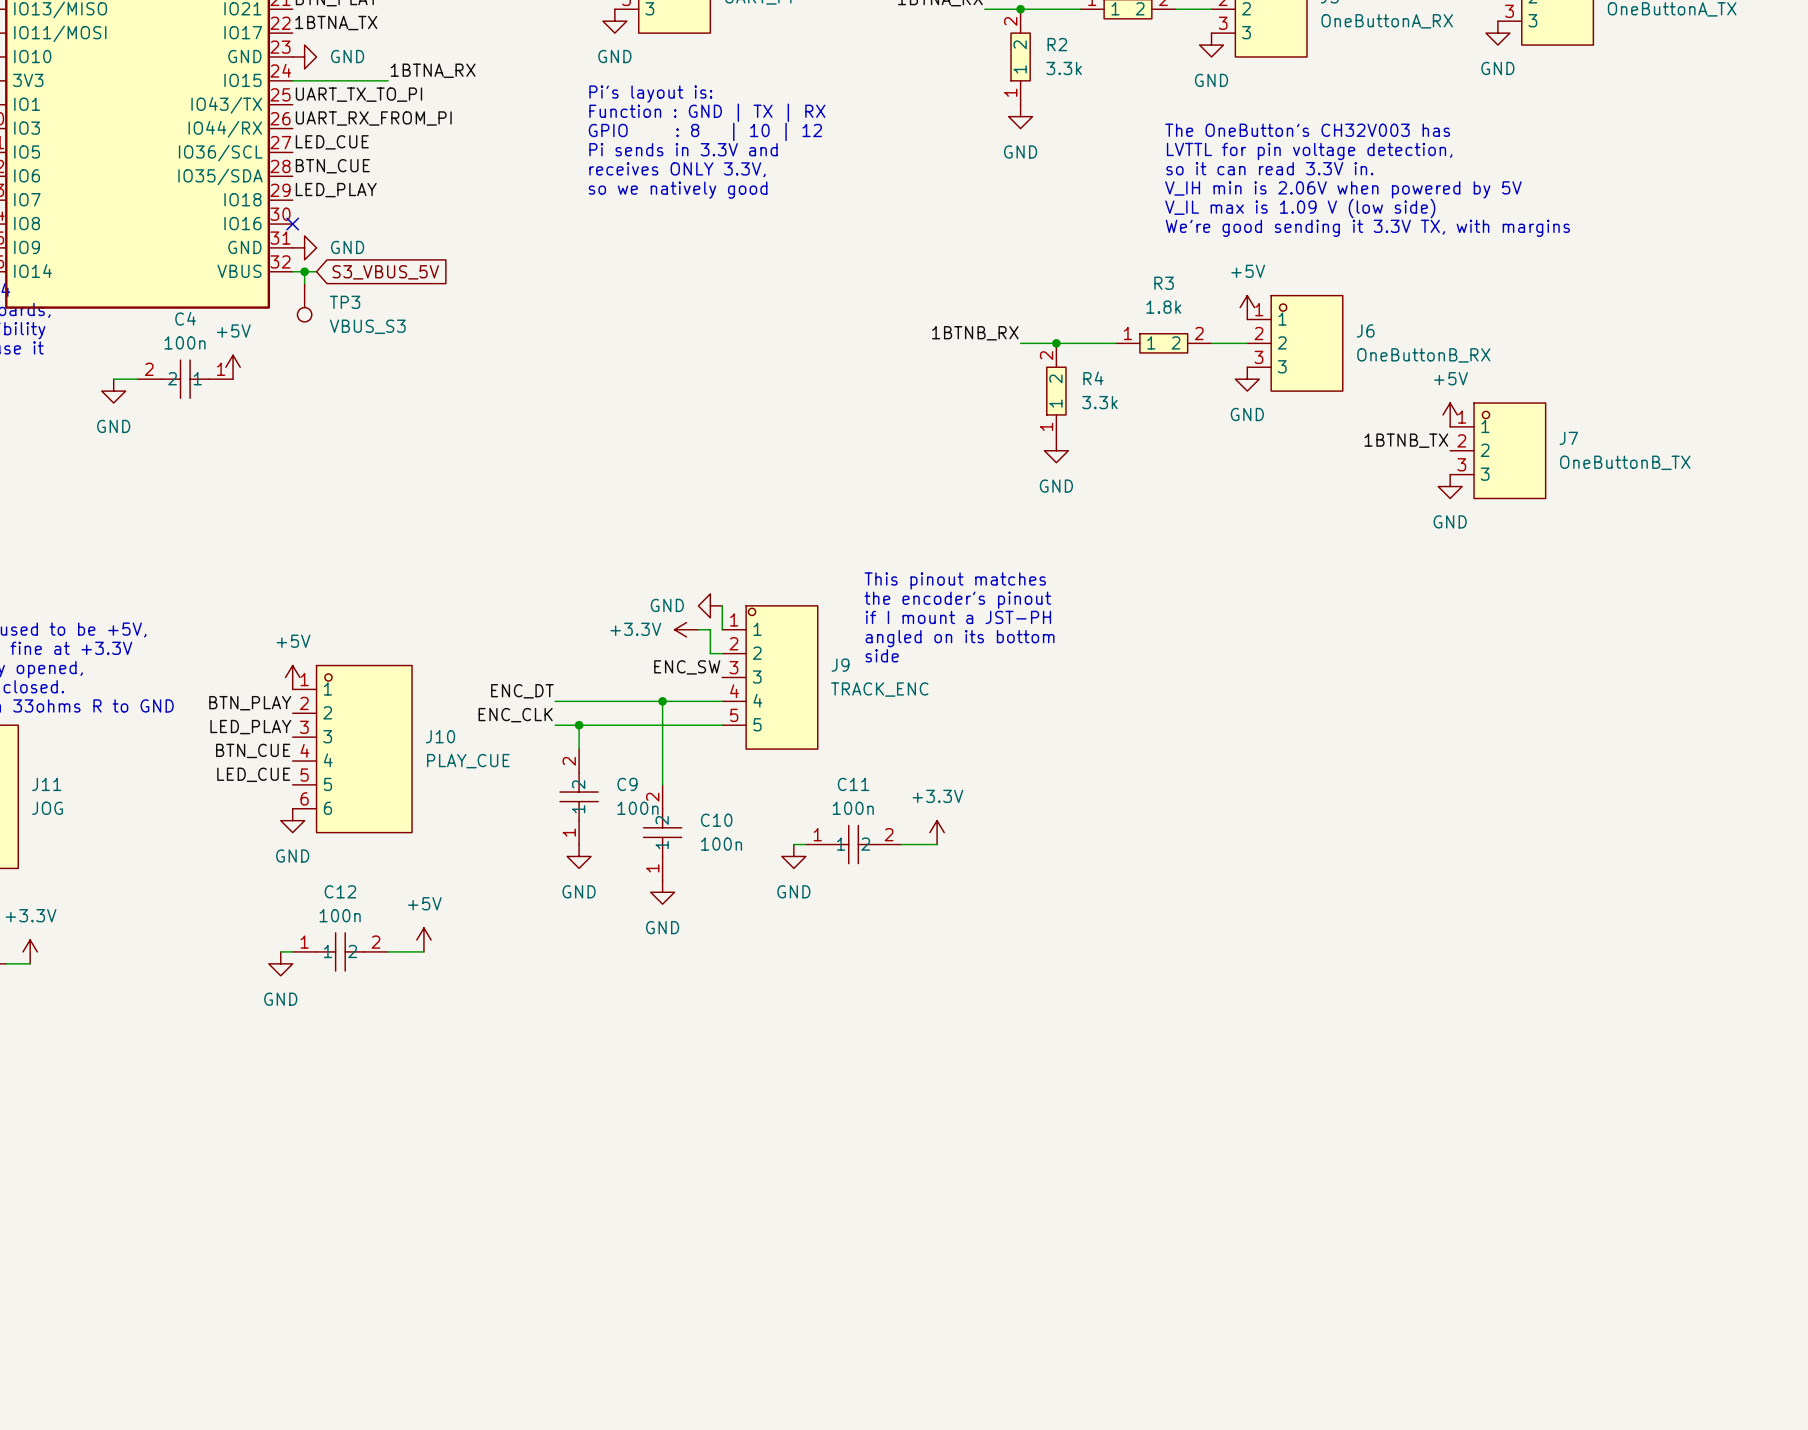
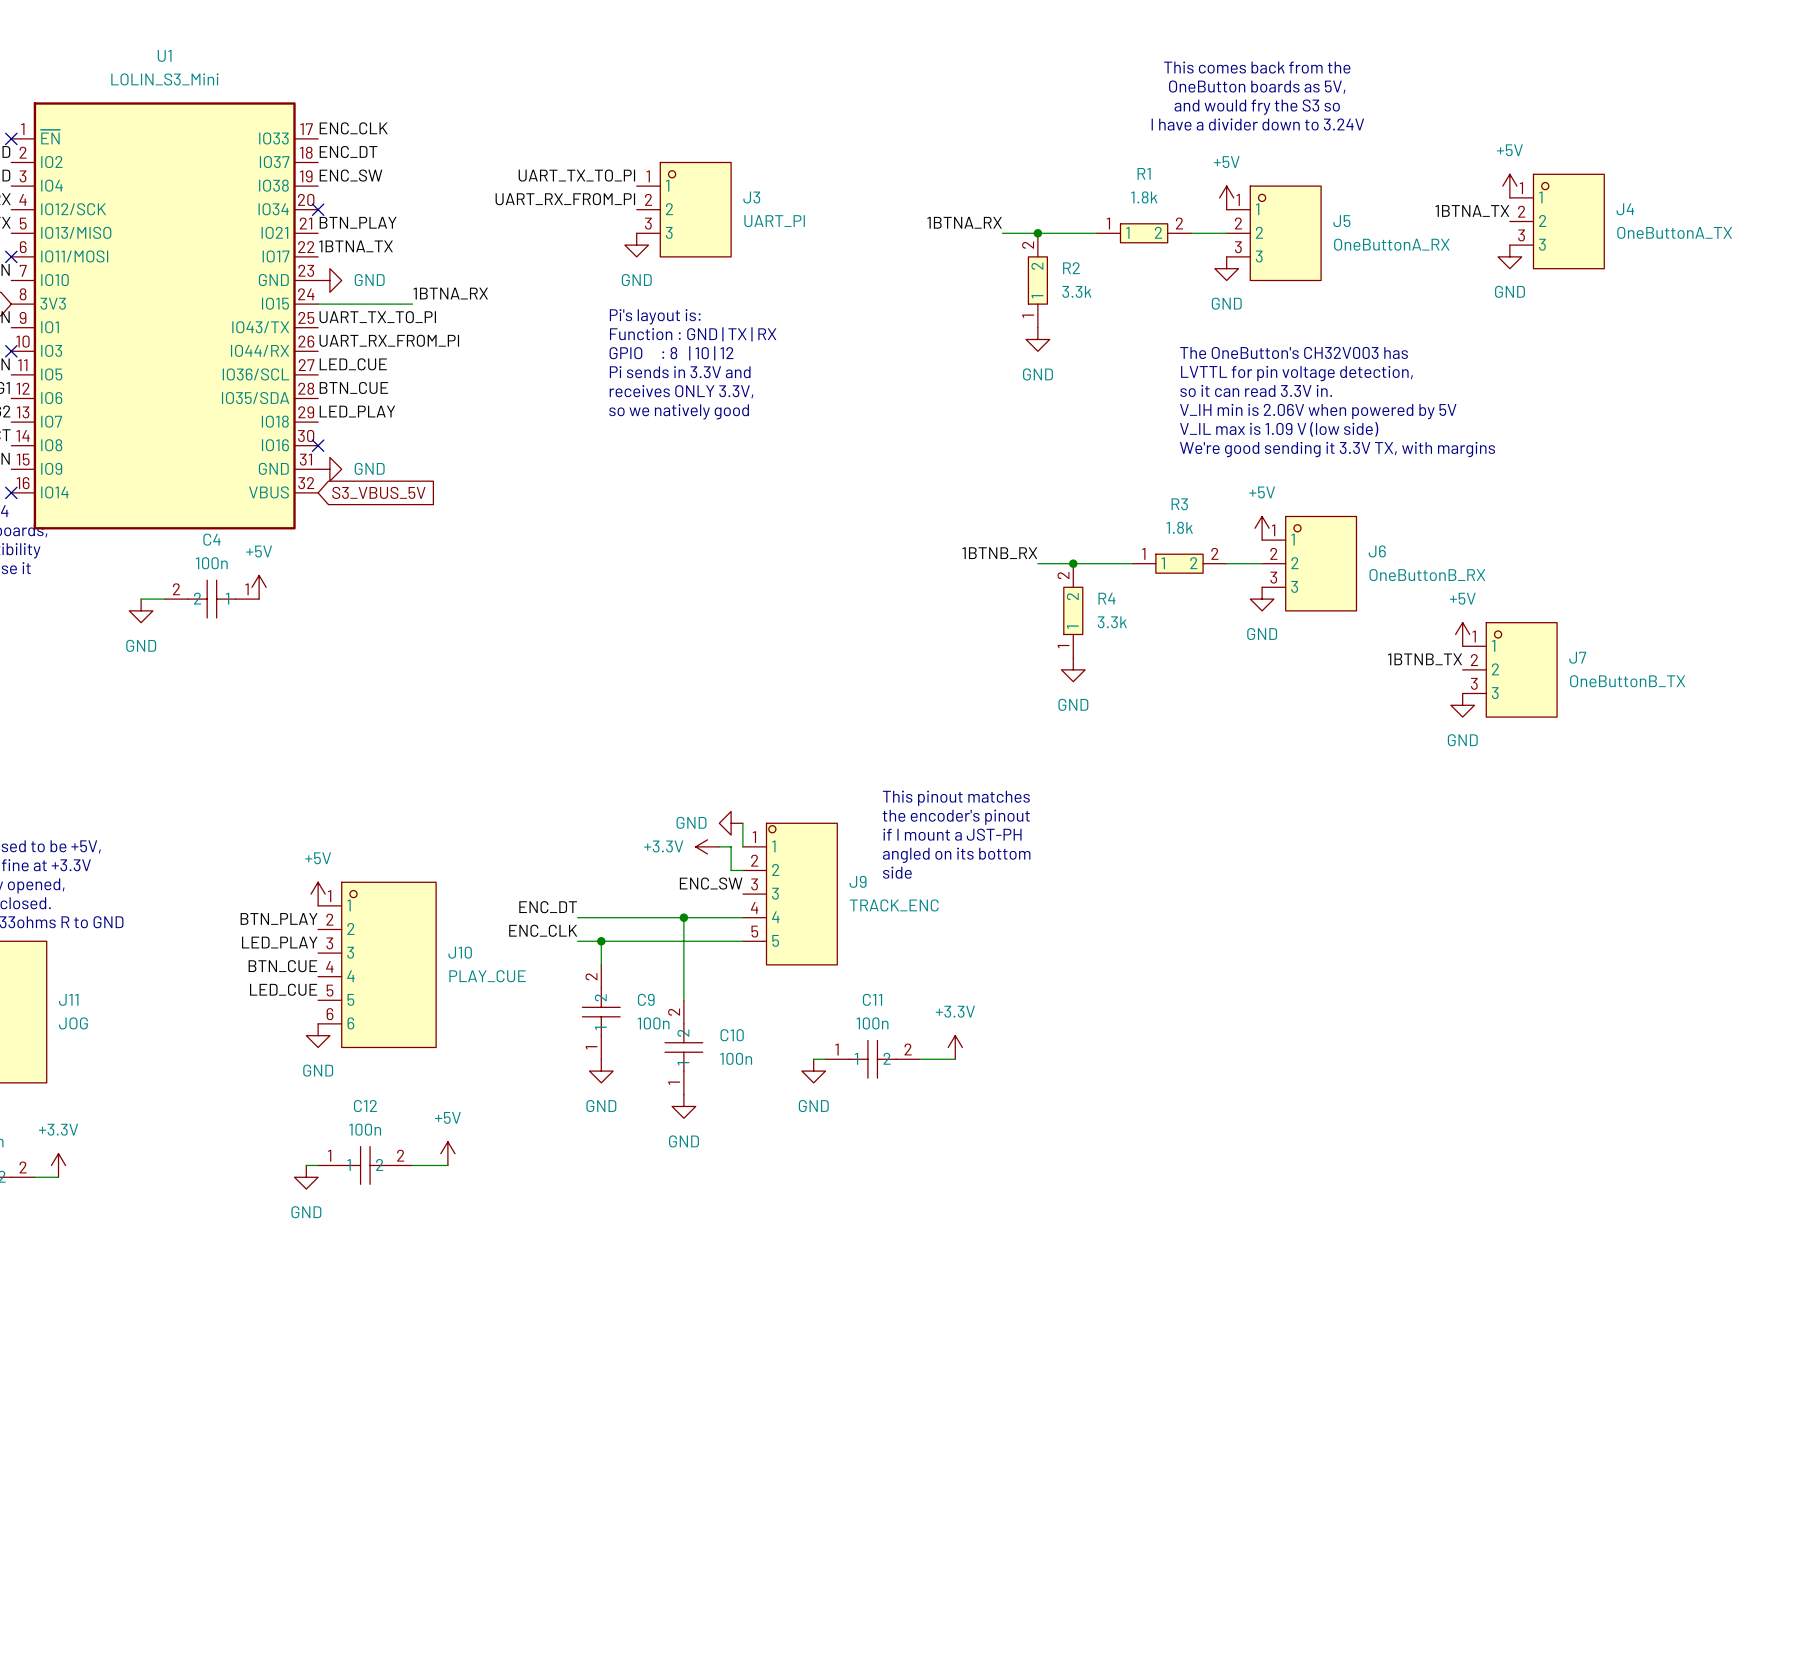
wire: (292, 271) (316, 271) -> none
wire: (304, 271) (304, 283) -> none
junction: (304, 271) -> none
global label position: S3_VBUS_5V (385, 272) -> S3_VBUS_5V (378, 492)
TP3: VBUS_S3 (304, 302) -> none

